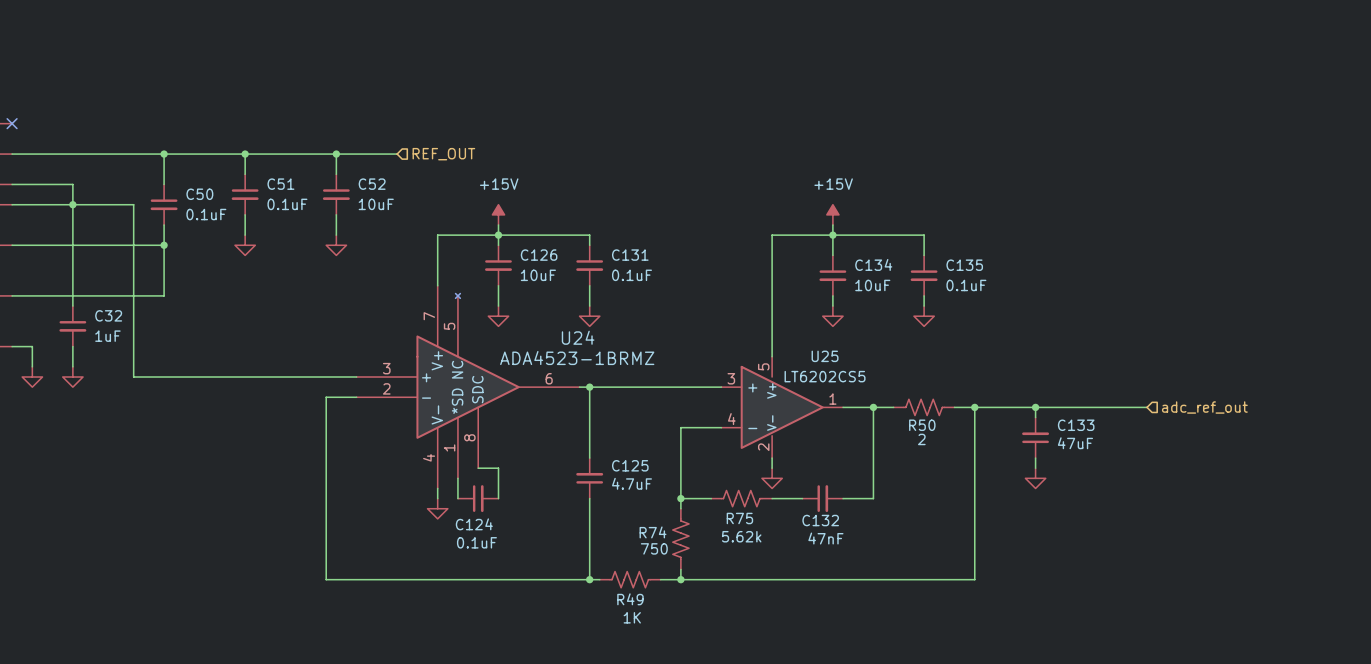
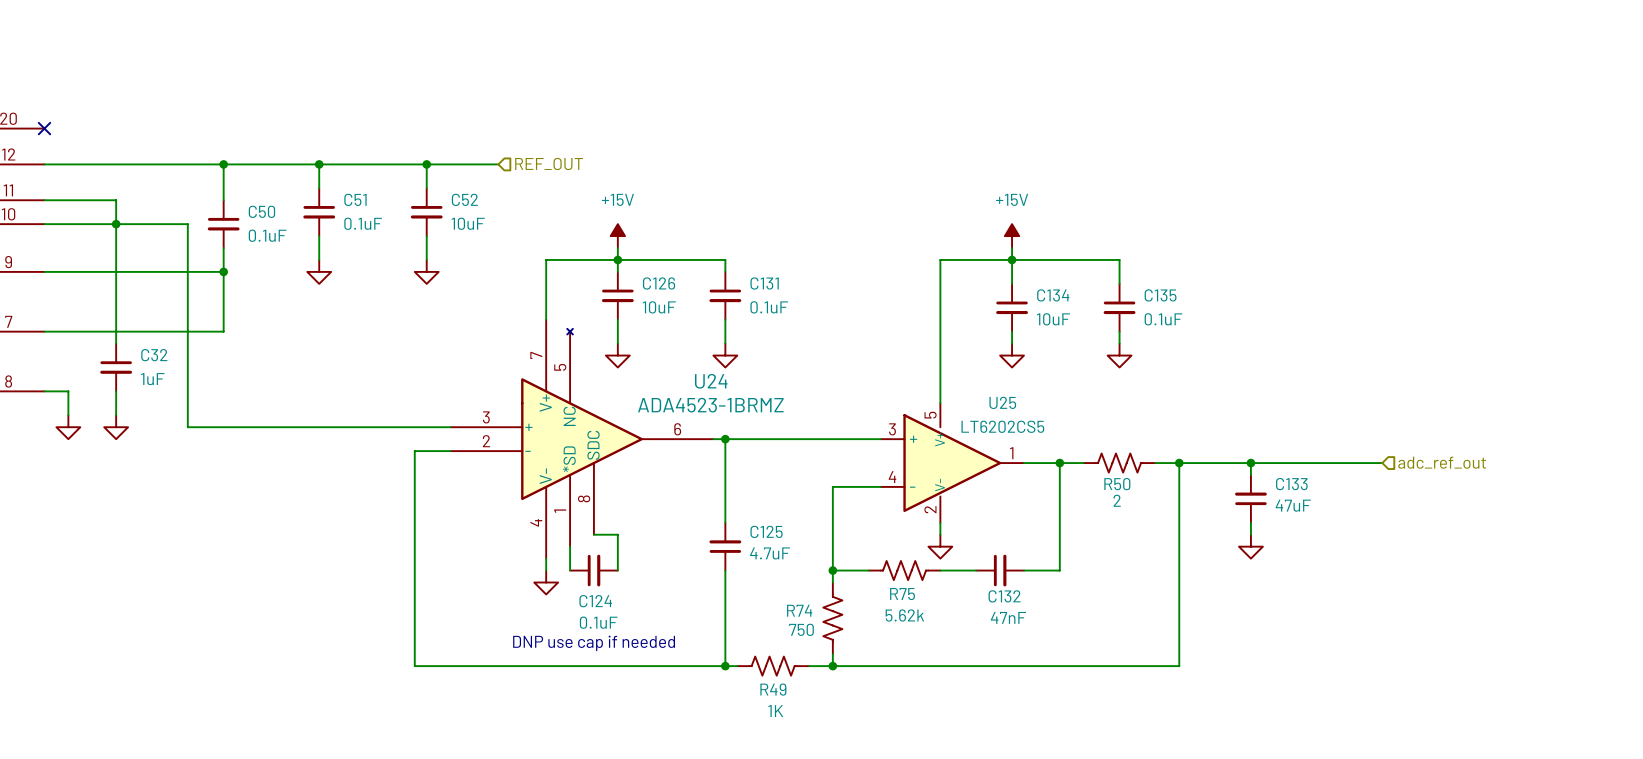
text: none -> DNP use cap if needed (594, 643)

